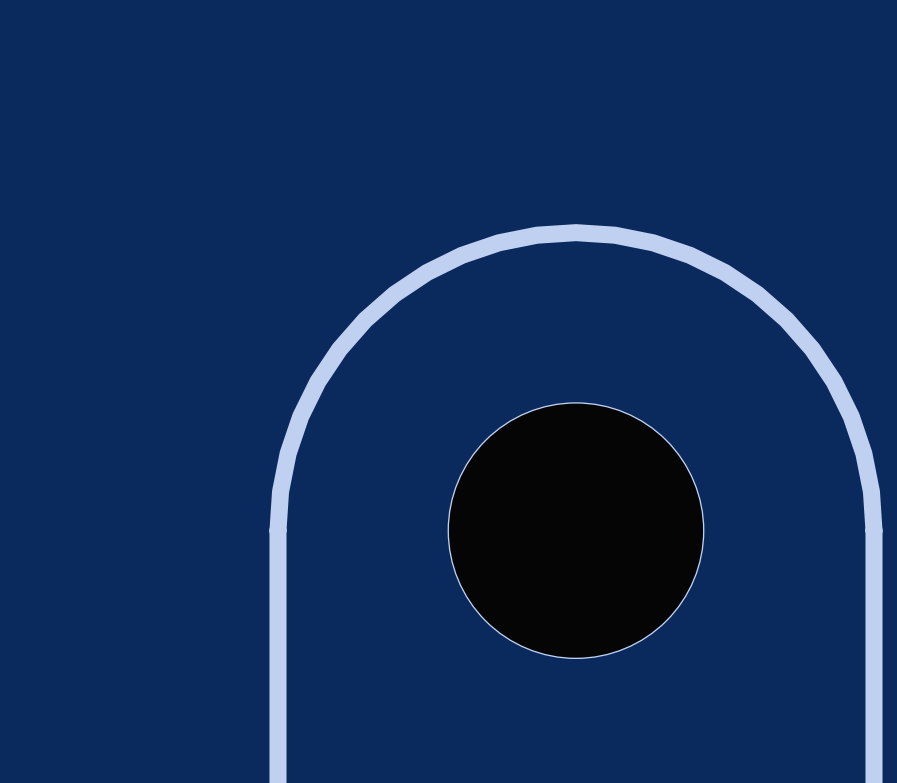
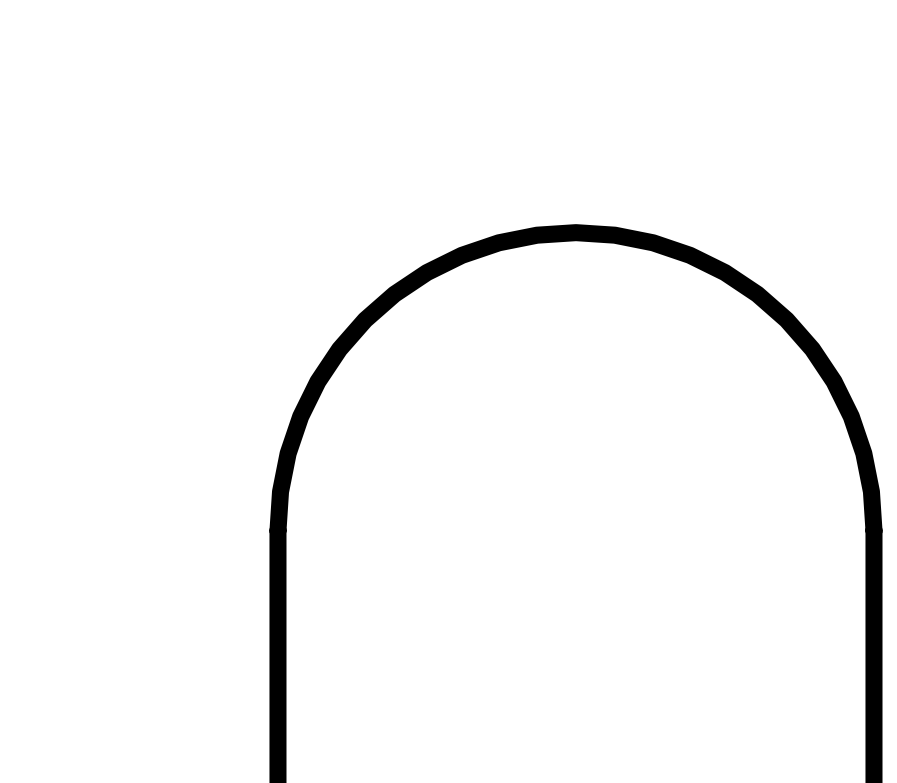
part: (575, 530) -> none

